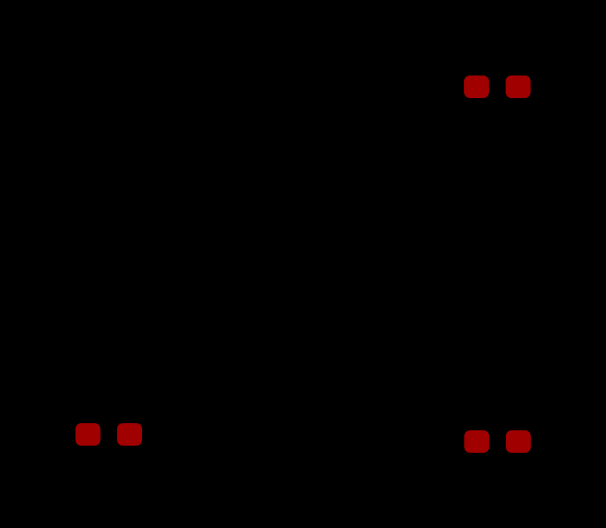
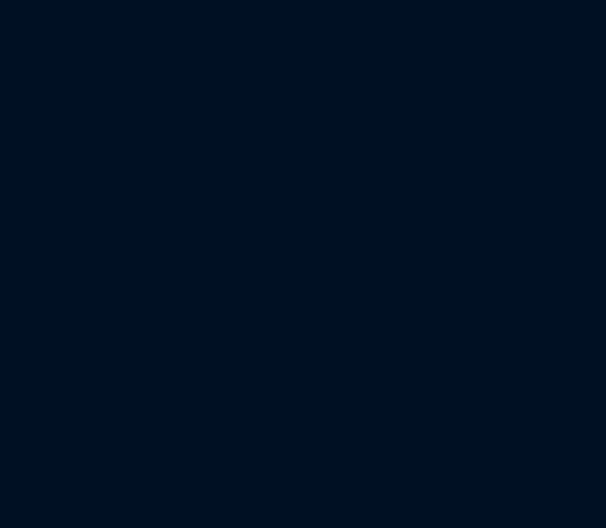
part: (497, 86) -> none
part: (108, 434) -> none
part: (497, 441) -> none

